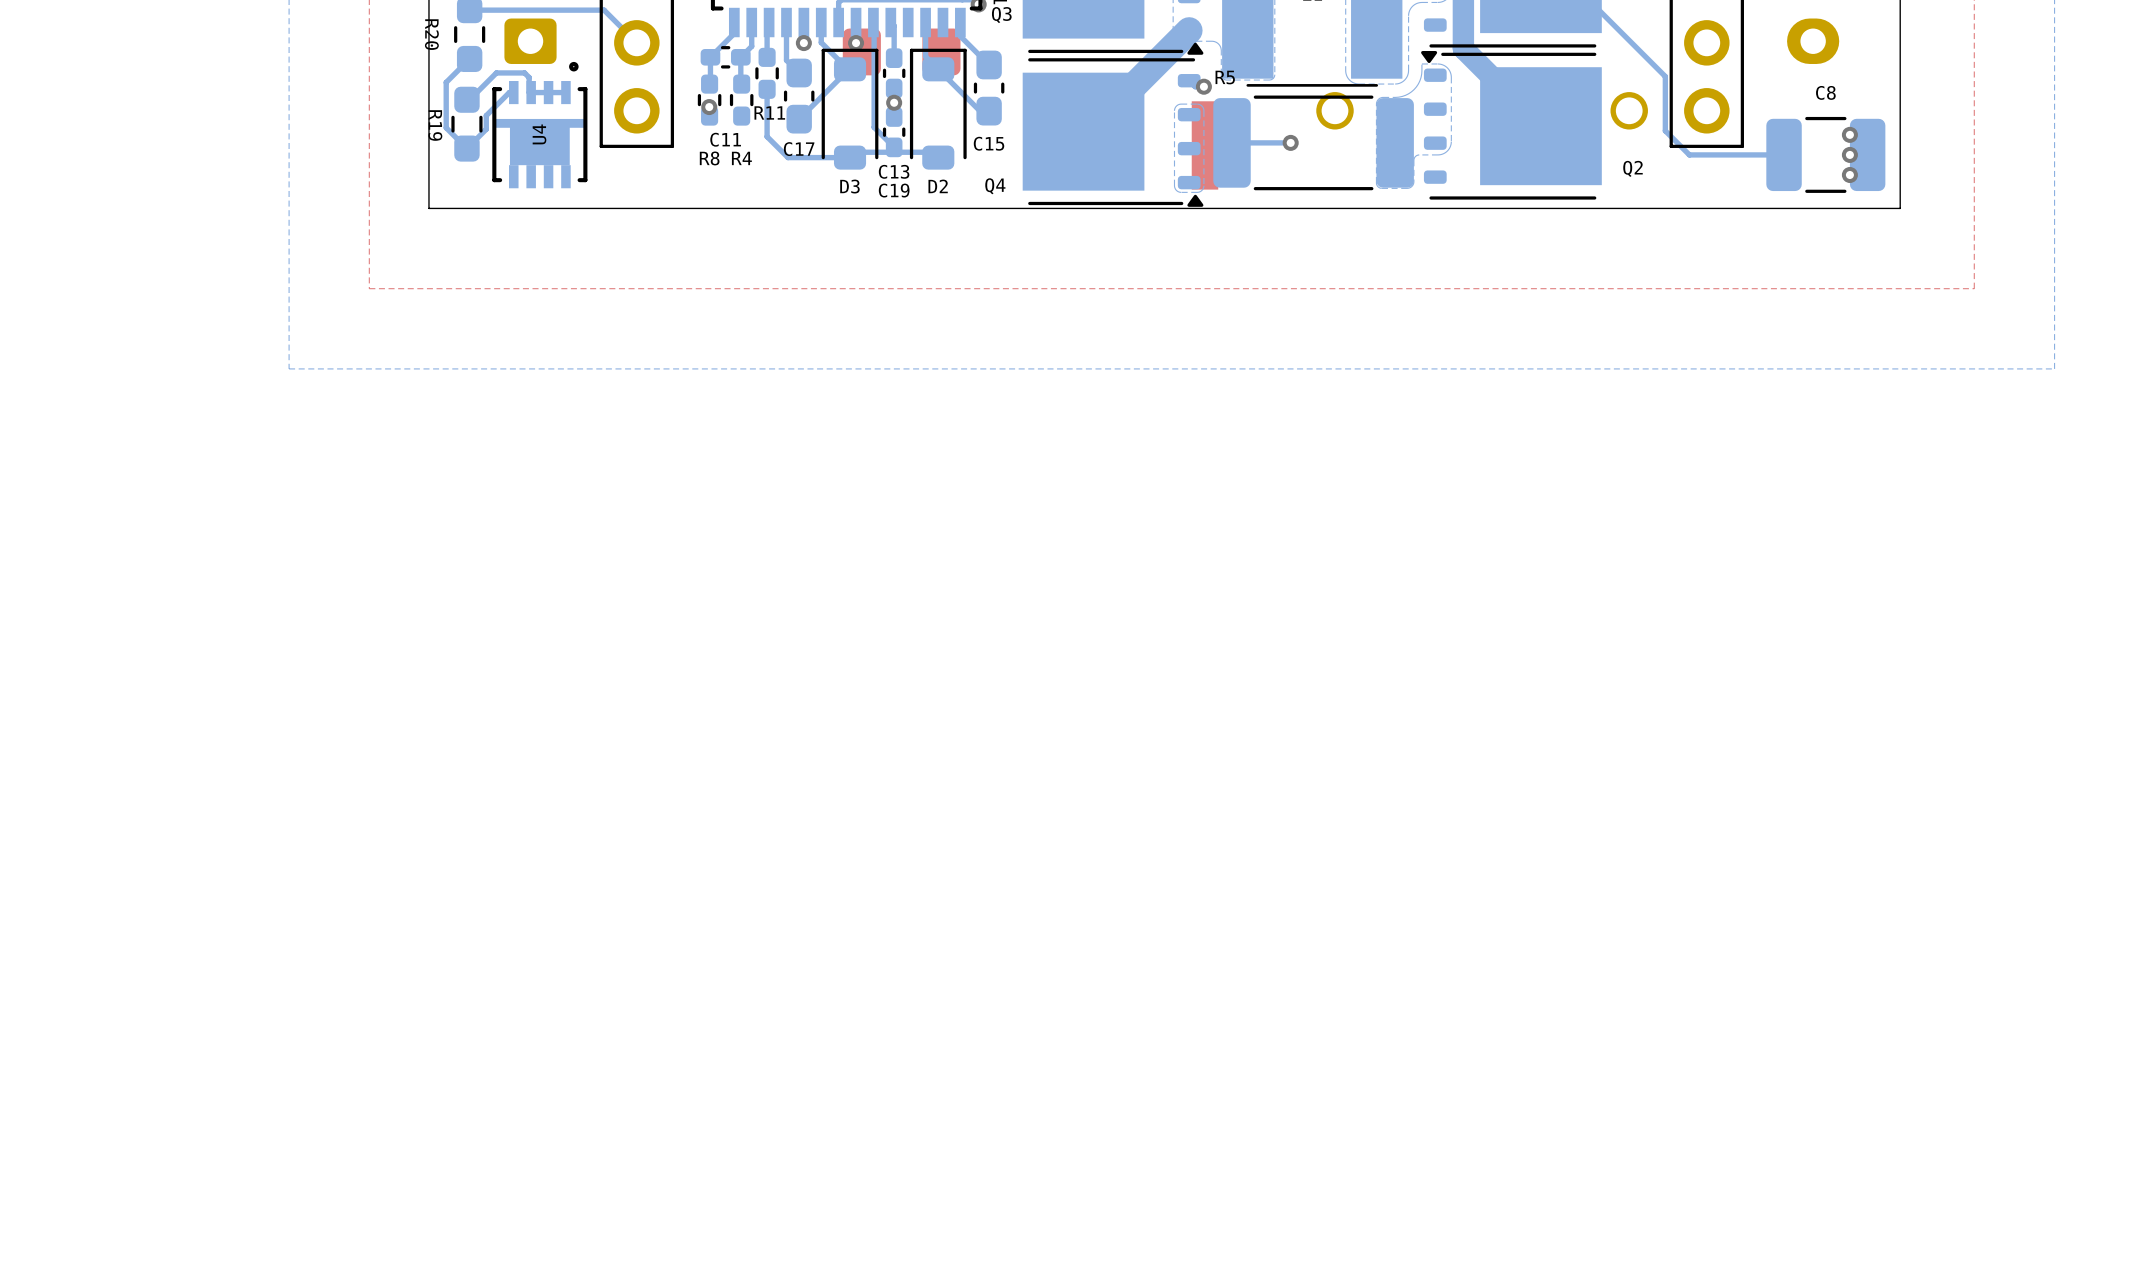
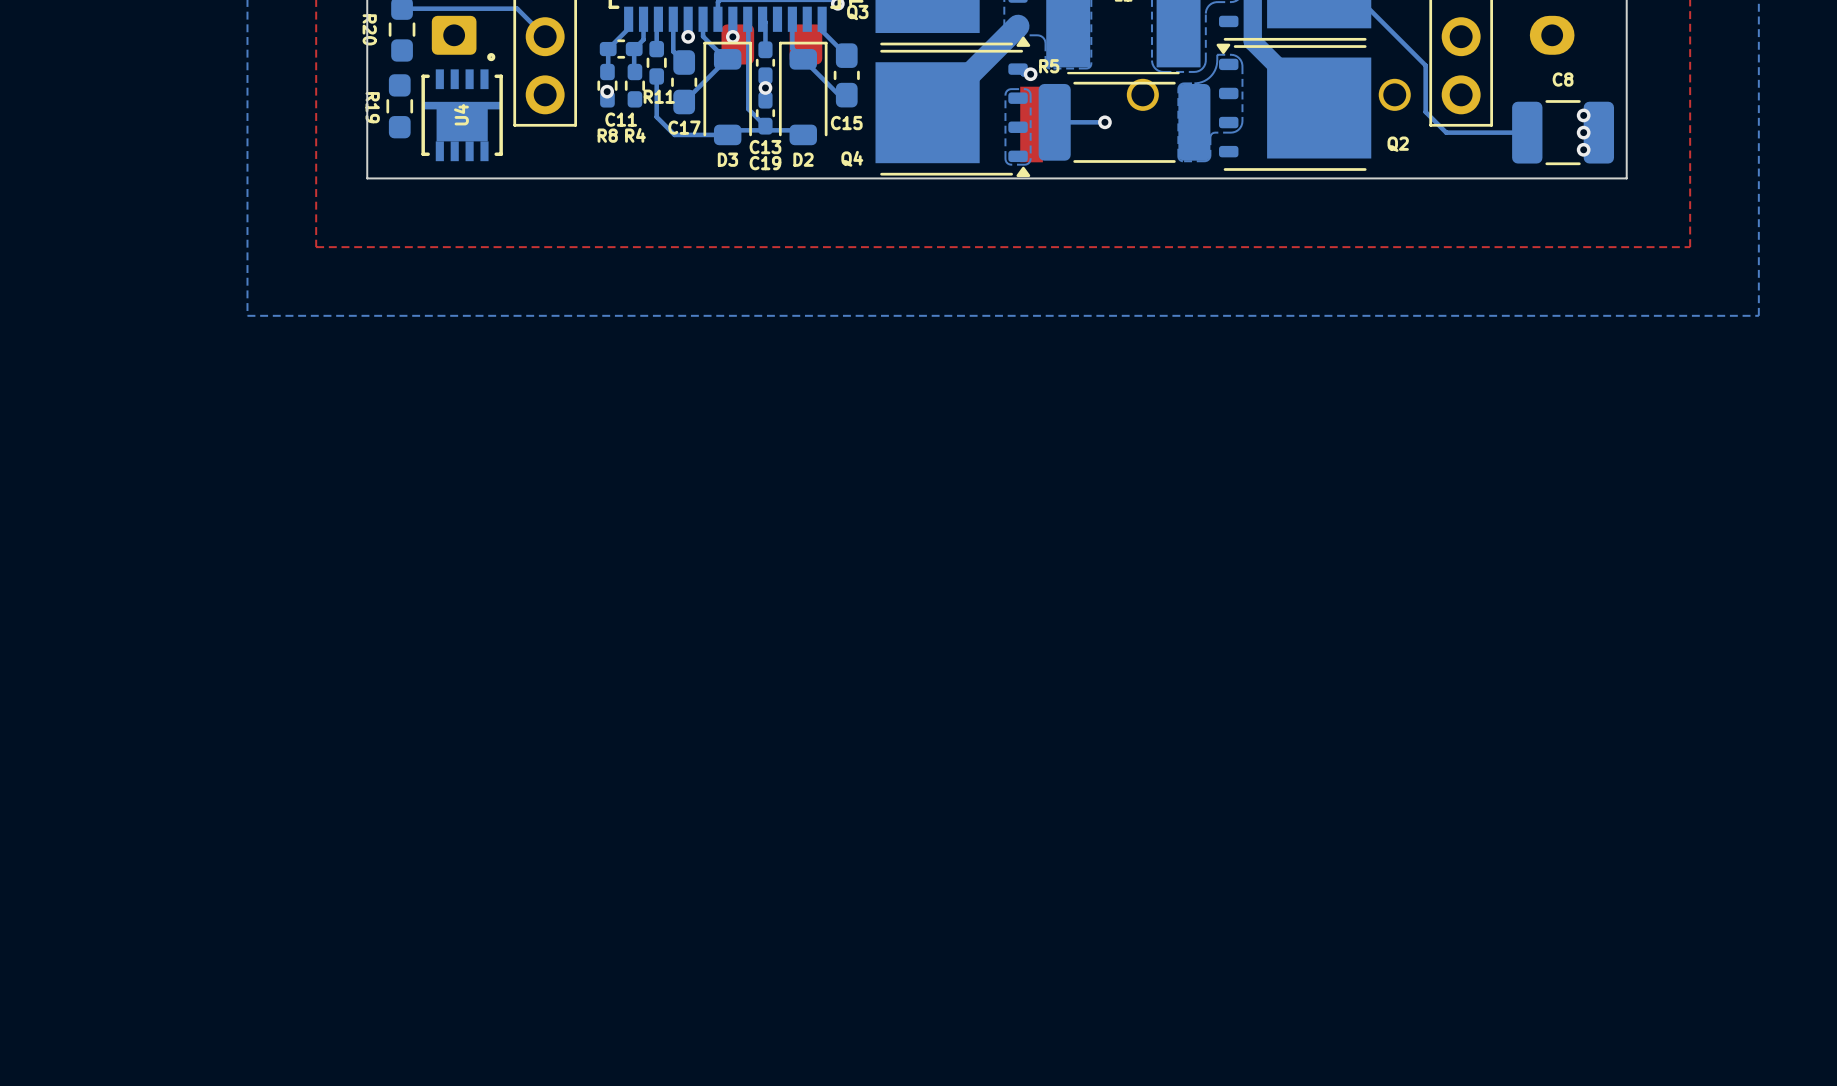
bottom track: (469, 58) (446, 82) (446, 127) (466, 148) -> none
bottom track: (513, 92) (509, 92) (486, 115) (486, 129) (466, 148) -> none
bottom track: (563, 92) (529, 92) (529, 77) (524, 72) (496, 72) (469, 99) -> none

